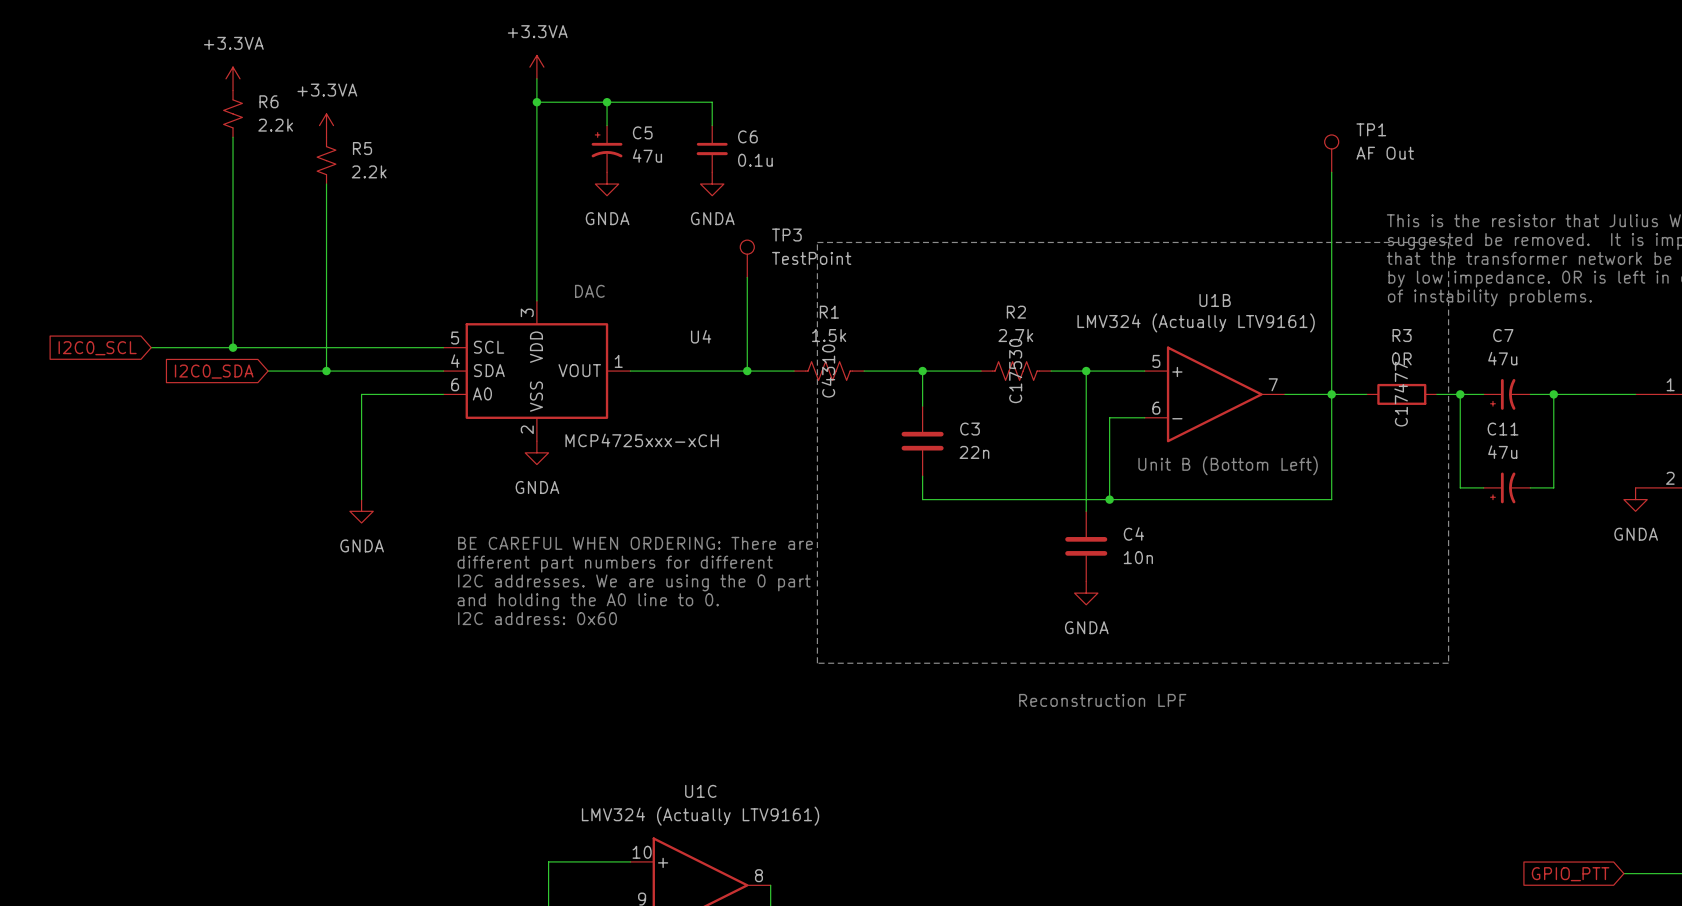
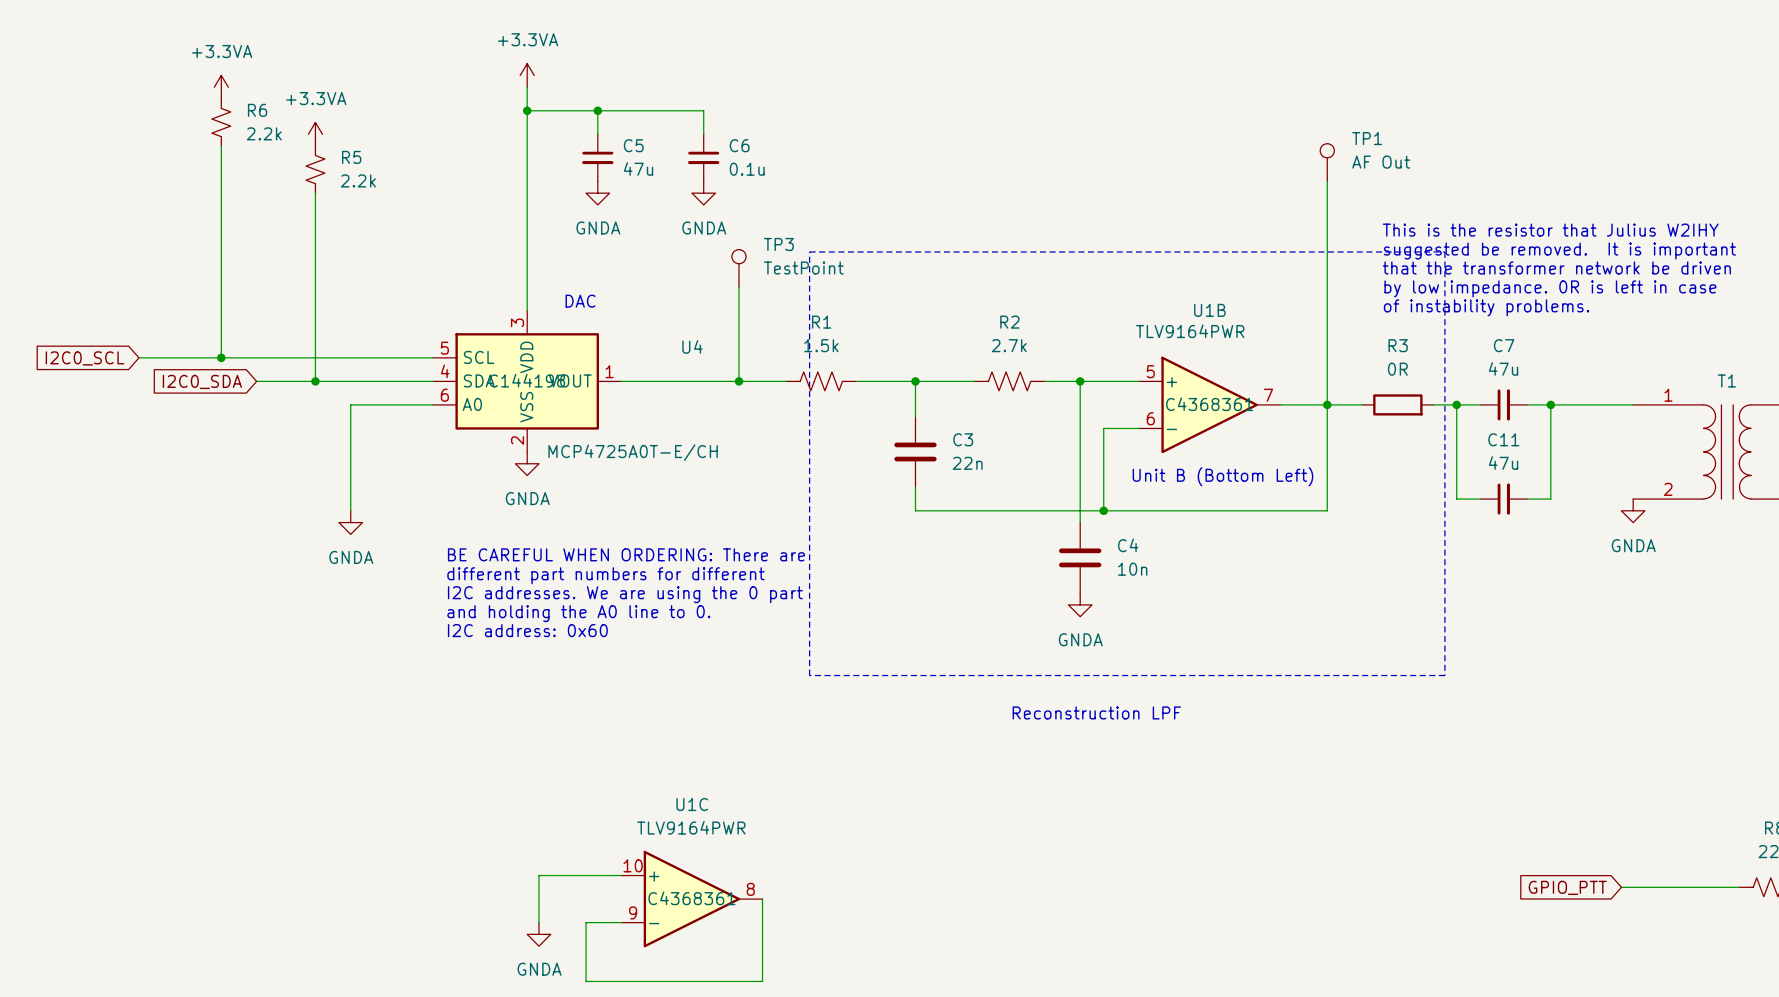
C5 symbol: [591, 125, 623, 173] -> [582, 134, 614, 182]
U1B value: LMV324 (Actually LTV9161) (1196, 322) -> TLV9164PWR (1190, 331)
U4 text: none -> C144198 (527, 380)
R1 text: C4310 (828, 371) -> none
R2 text: C17530 (1015, 371) -> none
C7 symbol: [1483, 378, 1531, 410] -> [1480, 389, 1528, 421]
U1B text: none -> C4368361 (1209, 404)
R3 text: C17477 (1401, 394) -> none
U4 value: MCP4725xxx-xCH (642, 440) -> MCP4725A0T-E/CH (633, 452)
C11 symbol: [1483, 472, 1531, 504] -> [1480, 483, 1528, 515]
U1C value: LMV324 (Actually LTV9161) (700, 816) -> TLV9164PWR (691, 827)
U1C text: none -> C4368361 (691, 898)

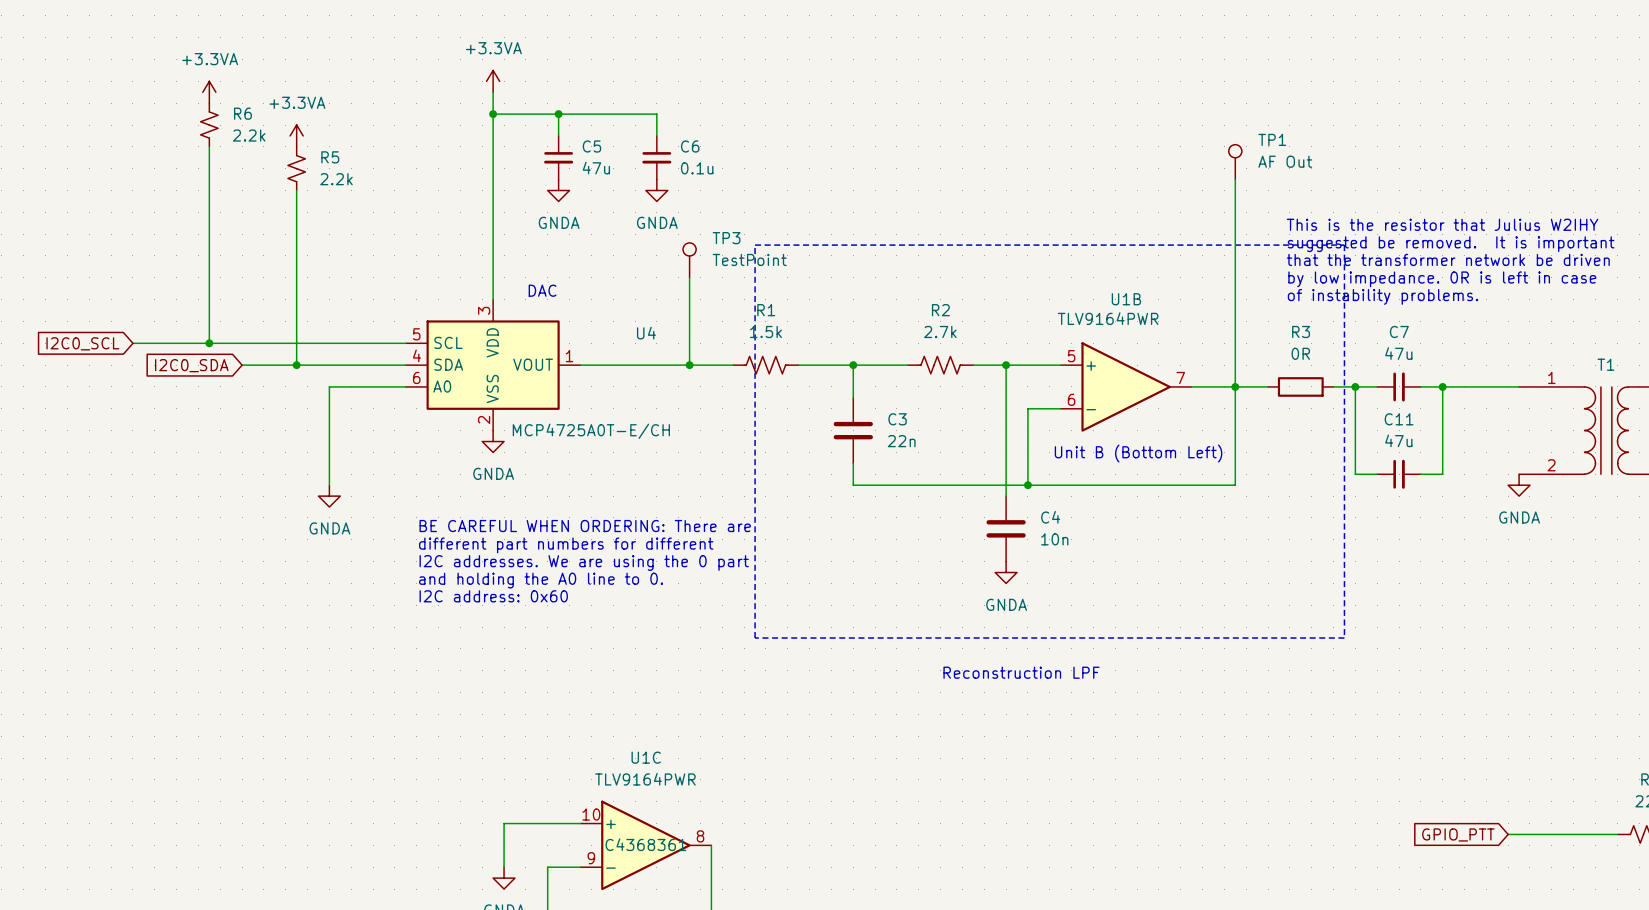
U4 text: C144198 (527, 380) -> none
U1B text: C4368361 (1209, 404) -> none

